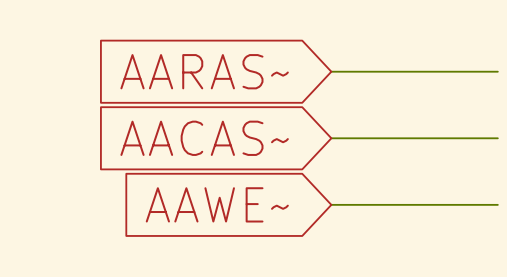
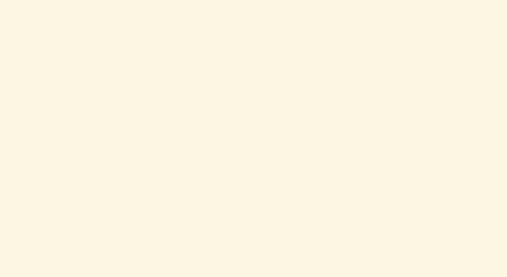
global label: AARAS~ (204, 71) -> none
wire: (331, 71) (497, 71) -> none
global label: AACAS~ (204, 138) -> none
wire: (331, 138) (497, 138) -> none
global label: AAWE~ (217, 204) -> none
wire: (331, 204) (497, 204) -> none

